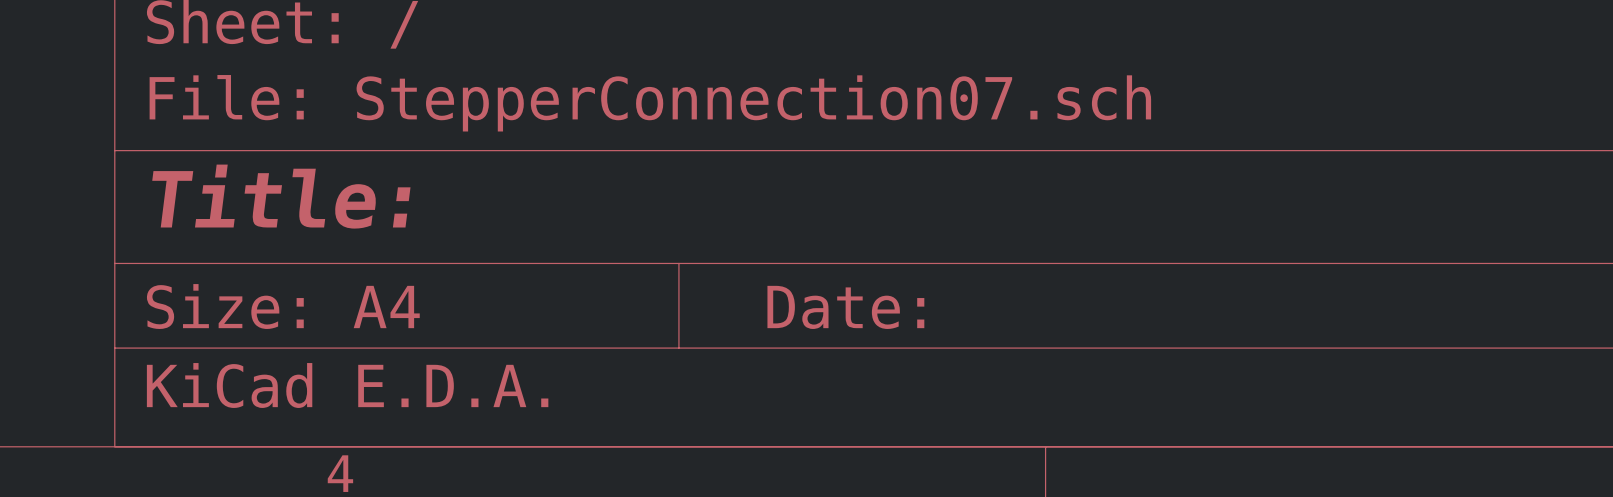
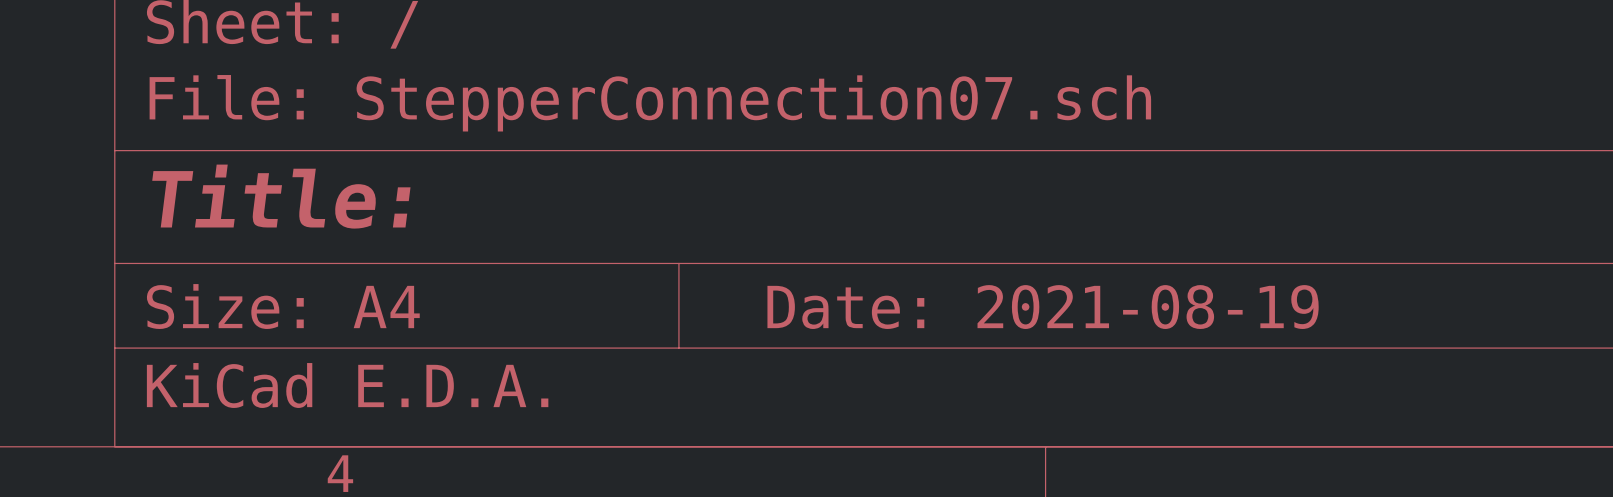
title block: Date: (845, 307) -> Date: 2021-08-19 (1043, 307)

